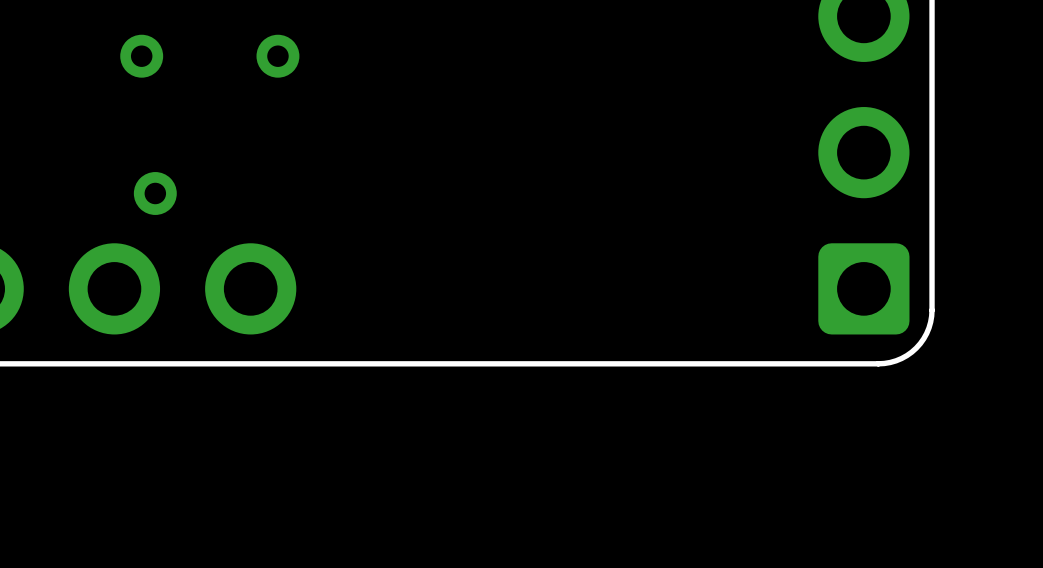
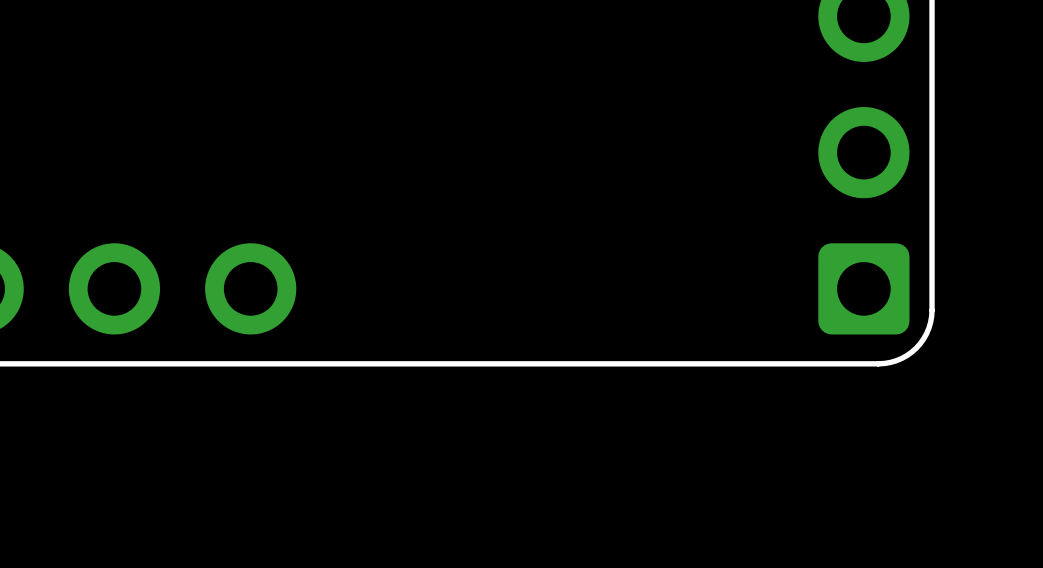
via: (141, 56) -> none
via: (277, 56) -> none
via: (155, 193) -> none

